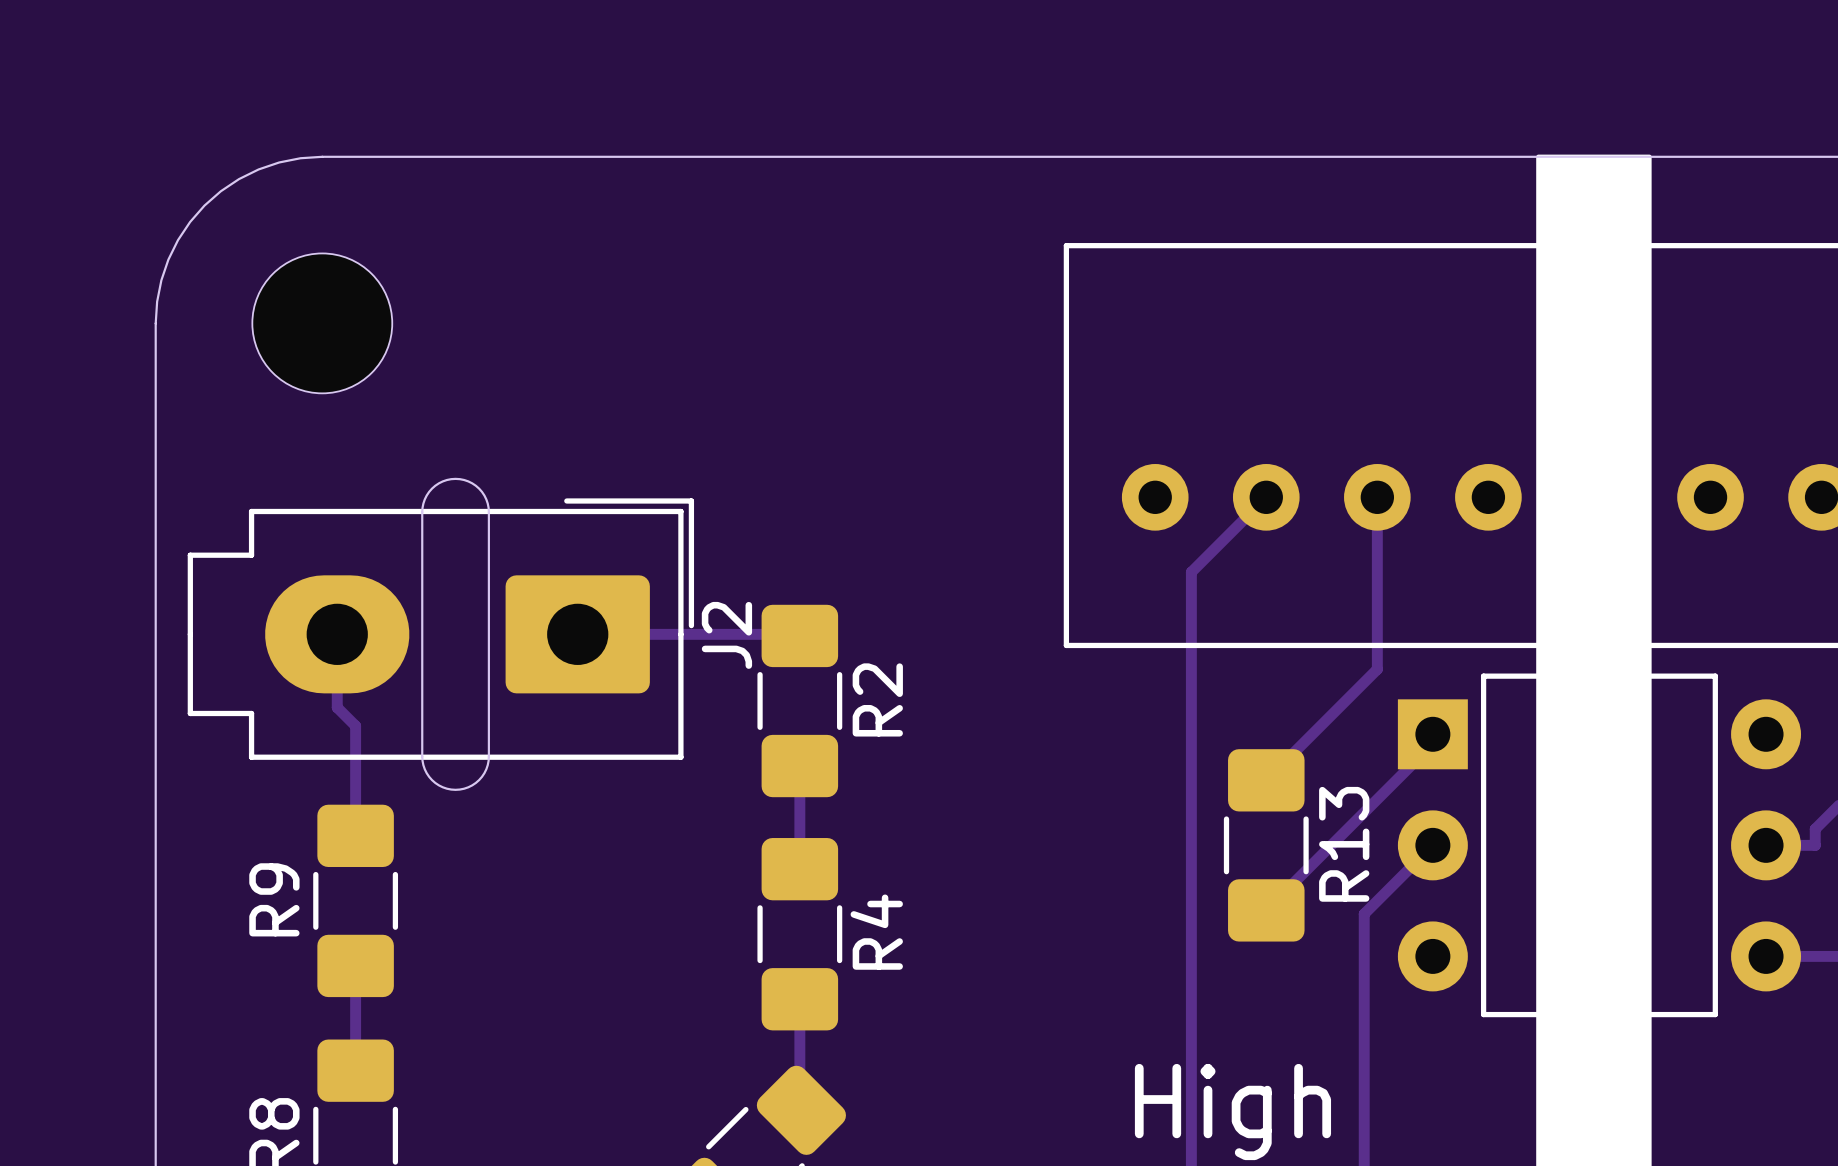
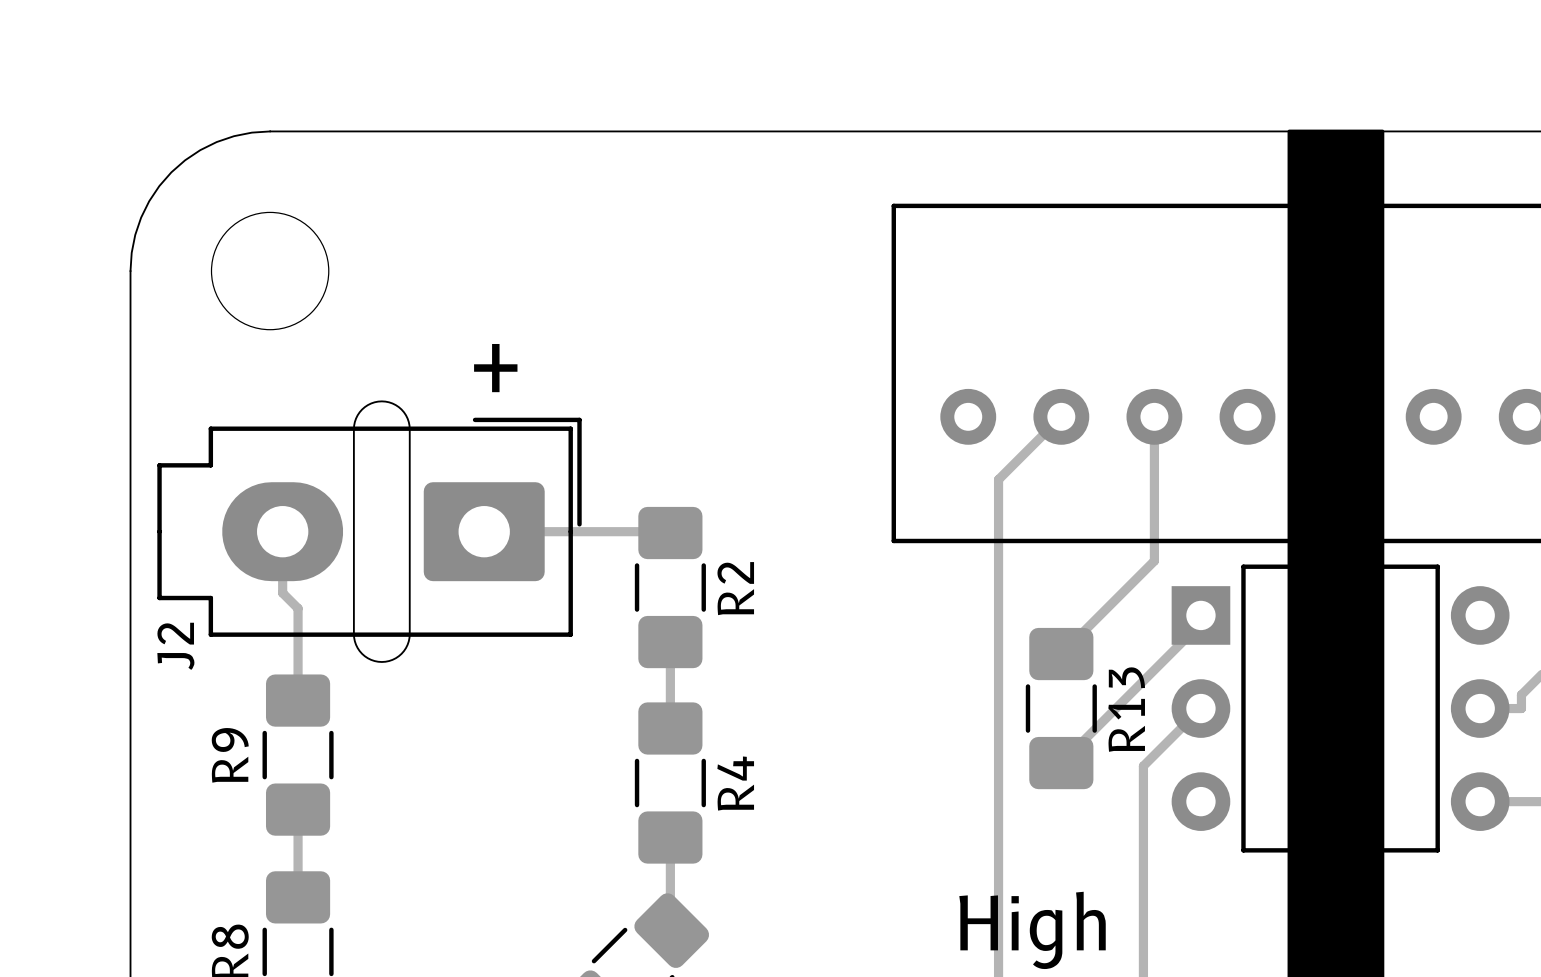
text: none -> + (495, 368)
J2 name position: J2 (726, 635) -> J2 (175, 646)

